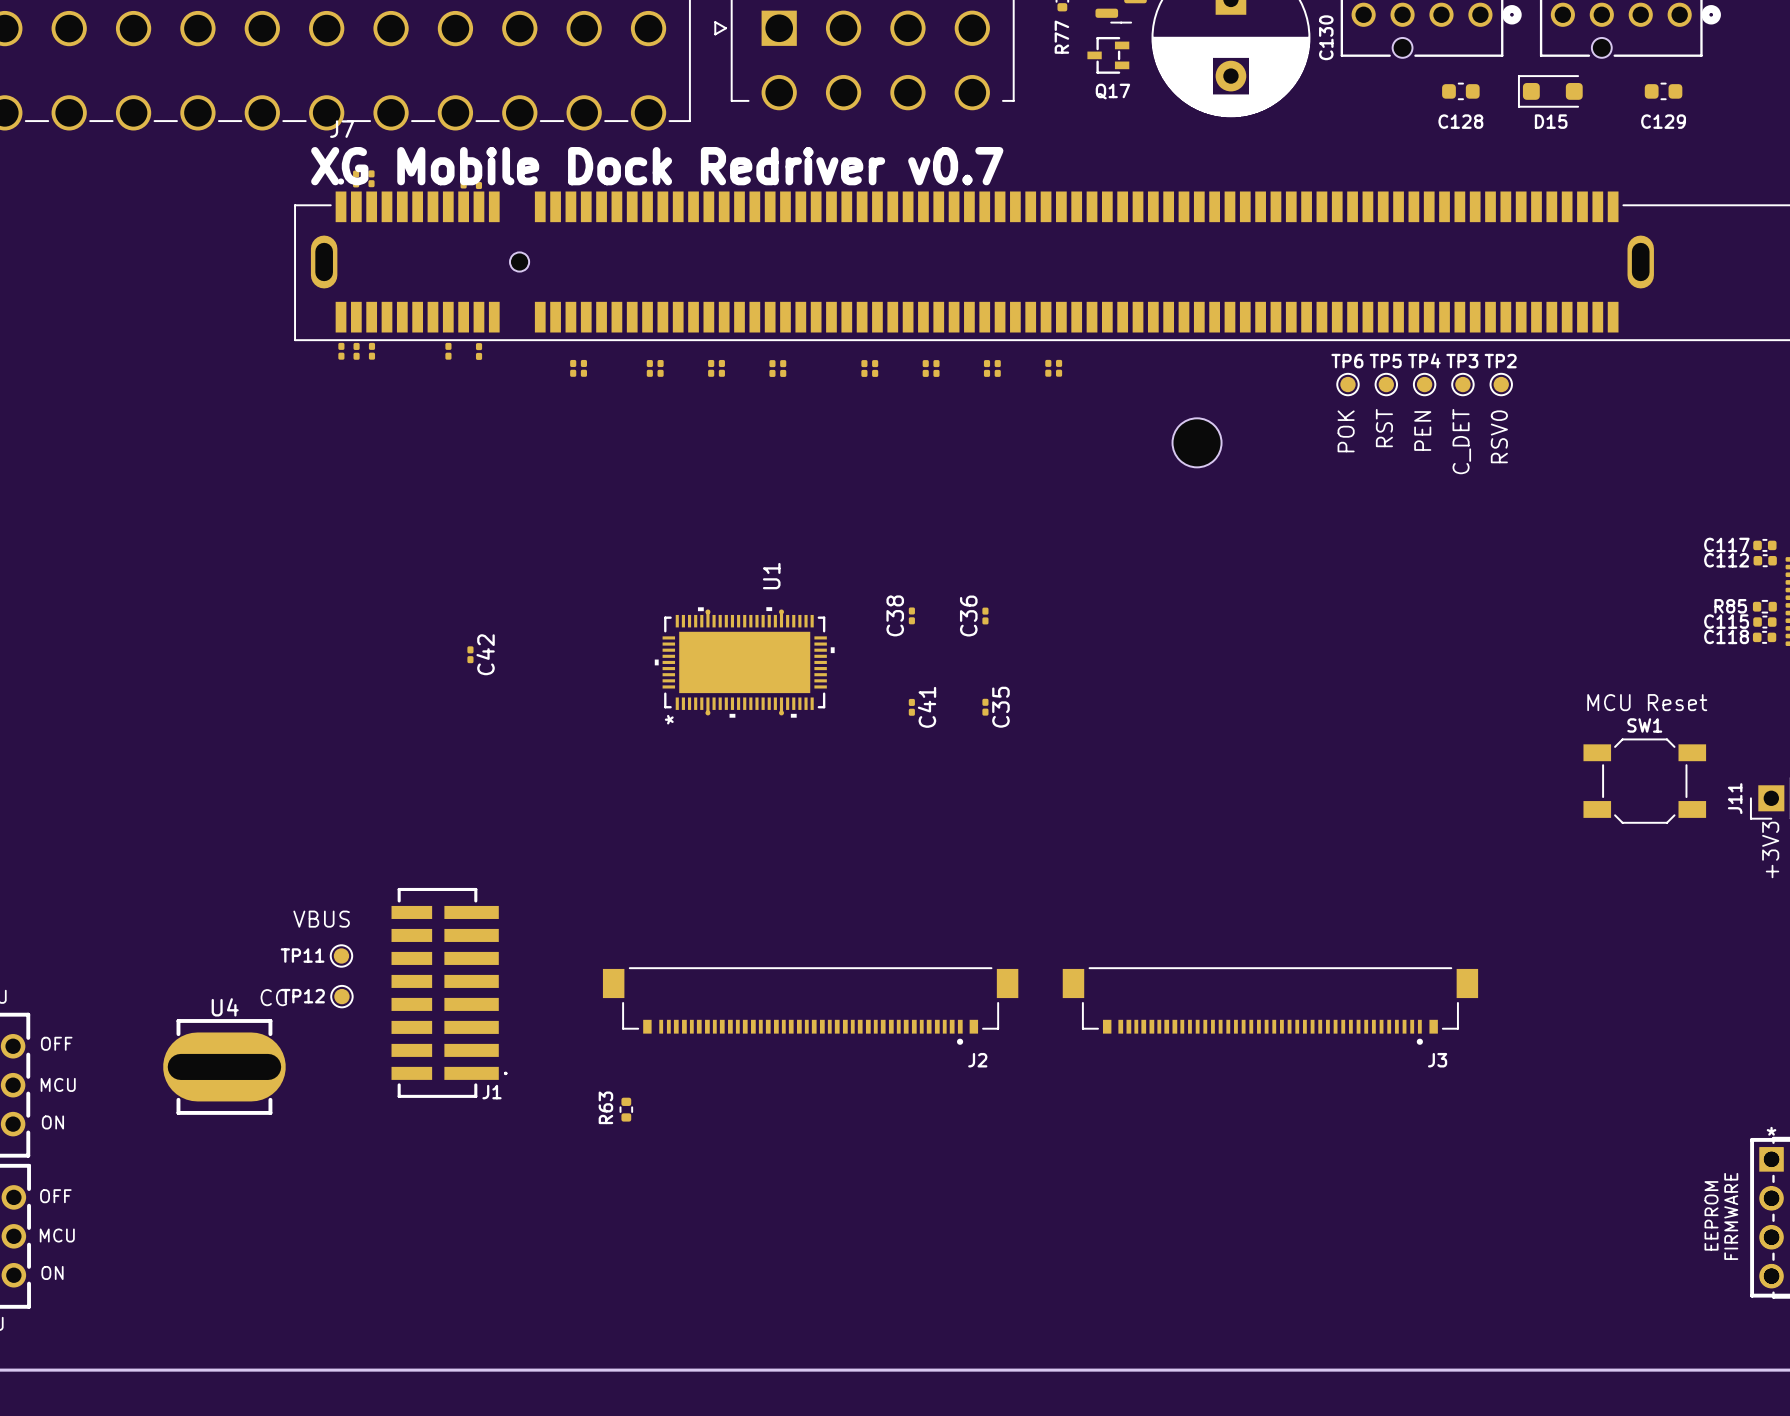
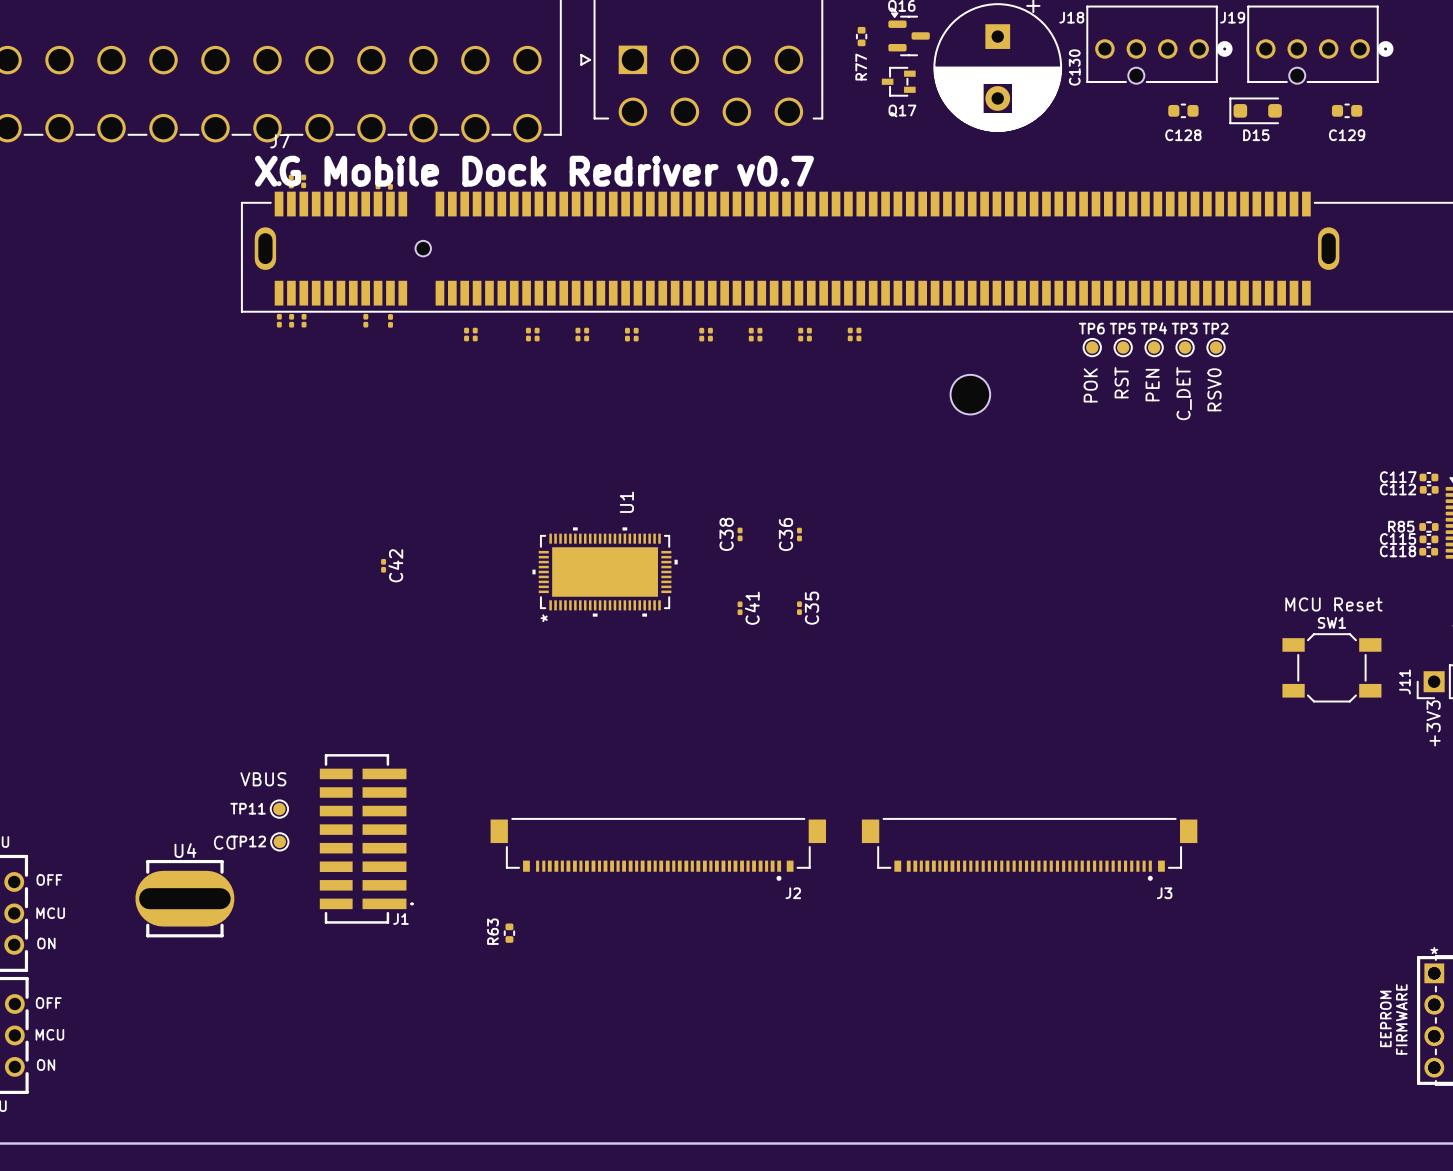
U1 footprint: [654, 607, 835, 718] -> [532, 527, 678, 617]

